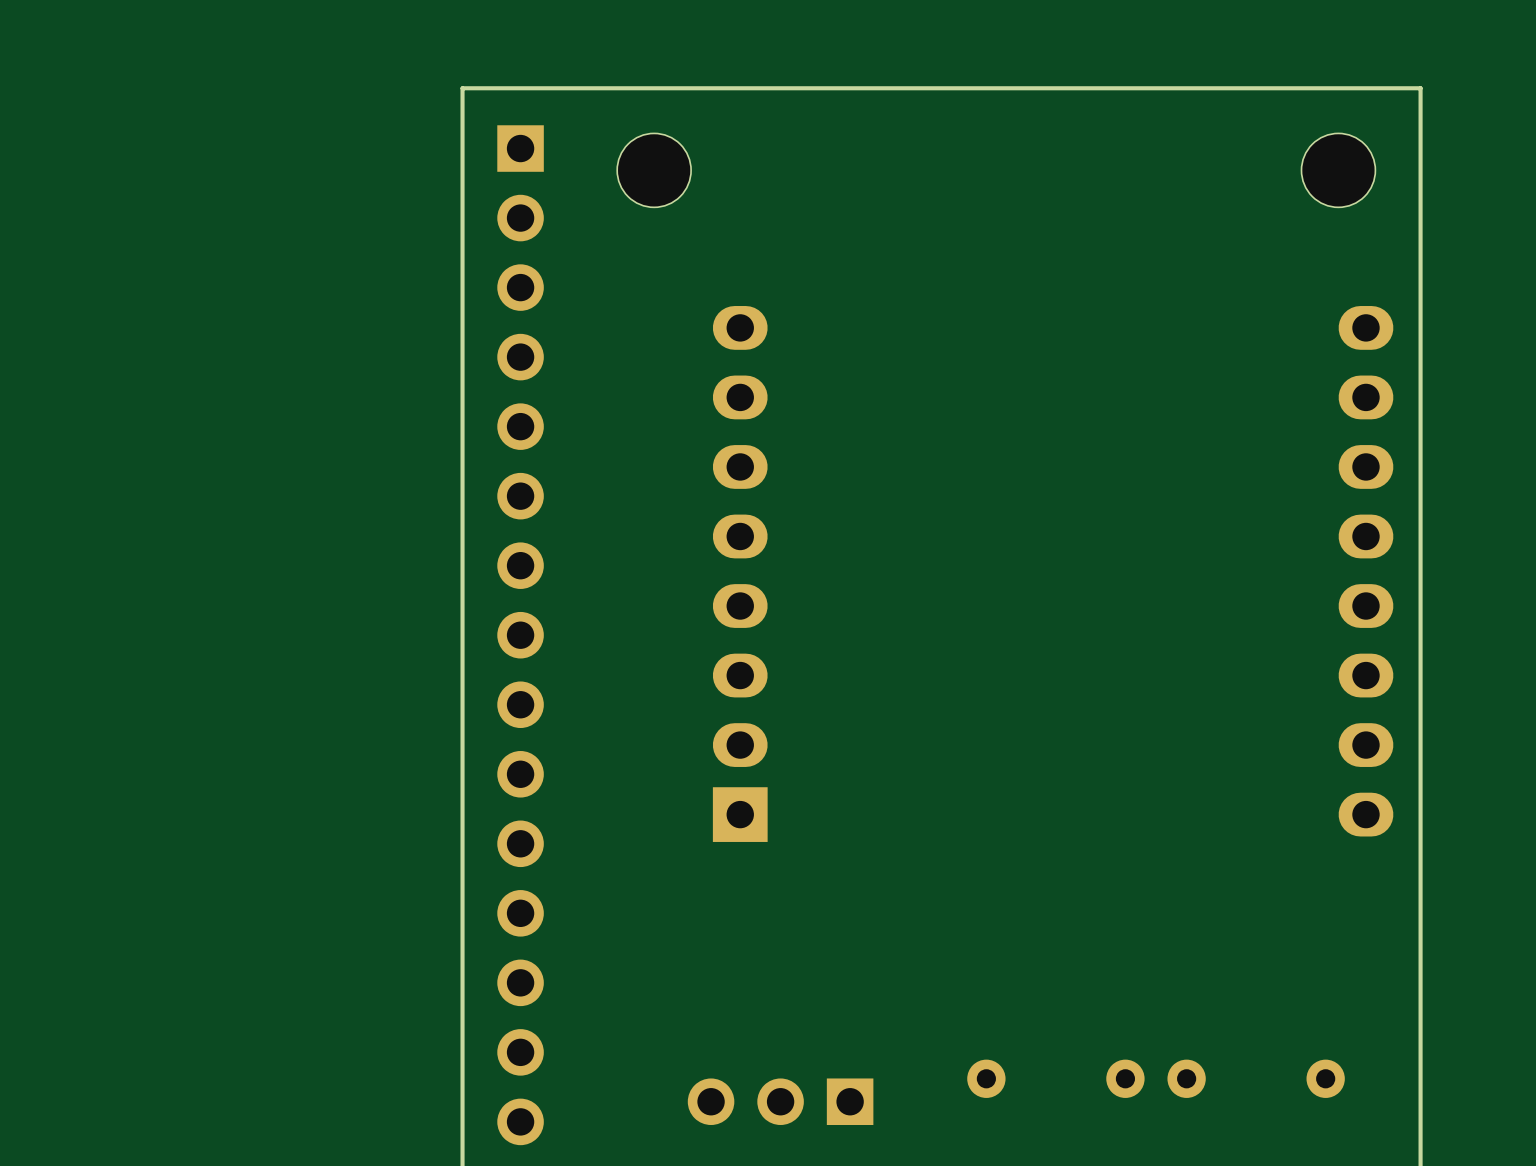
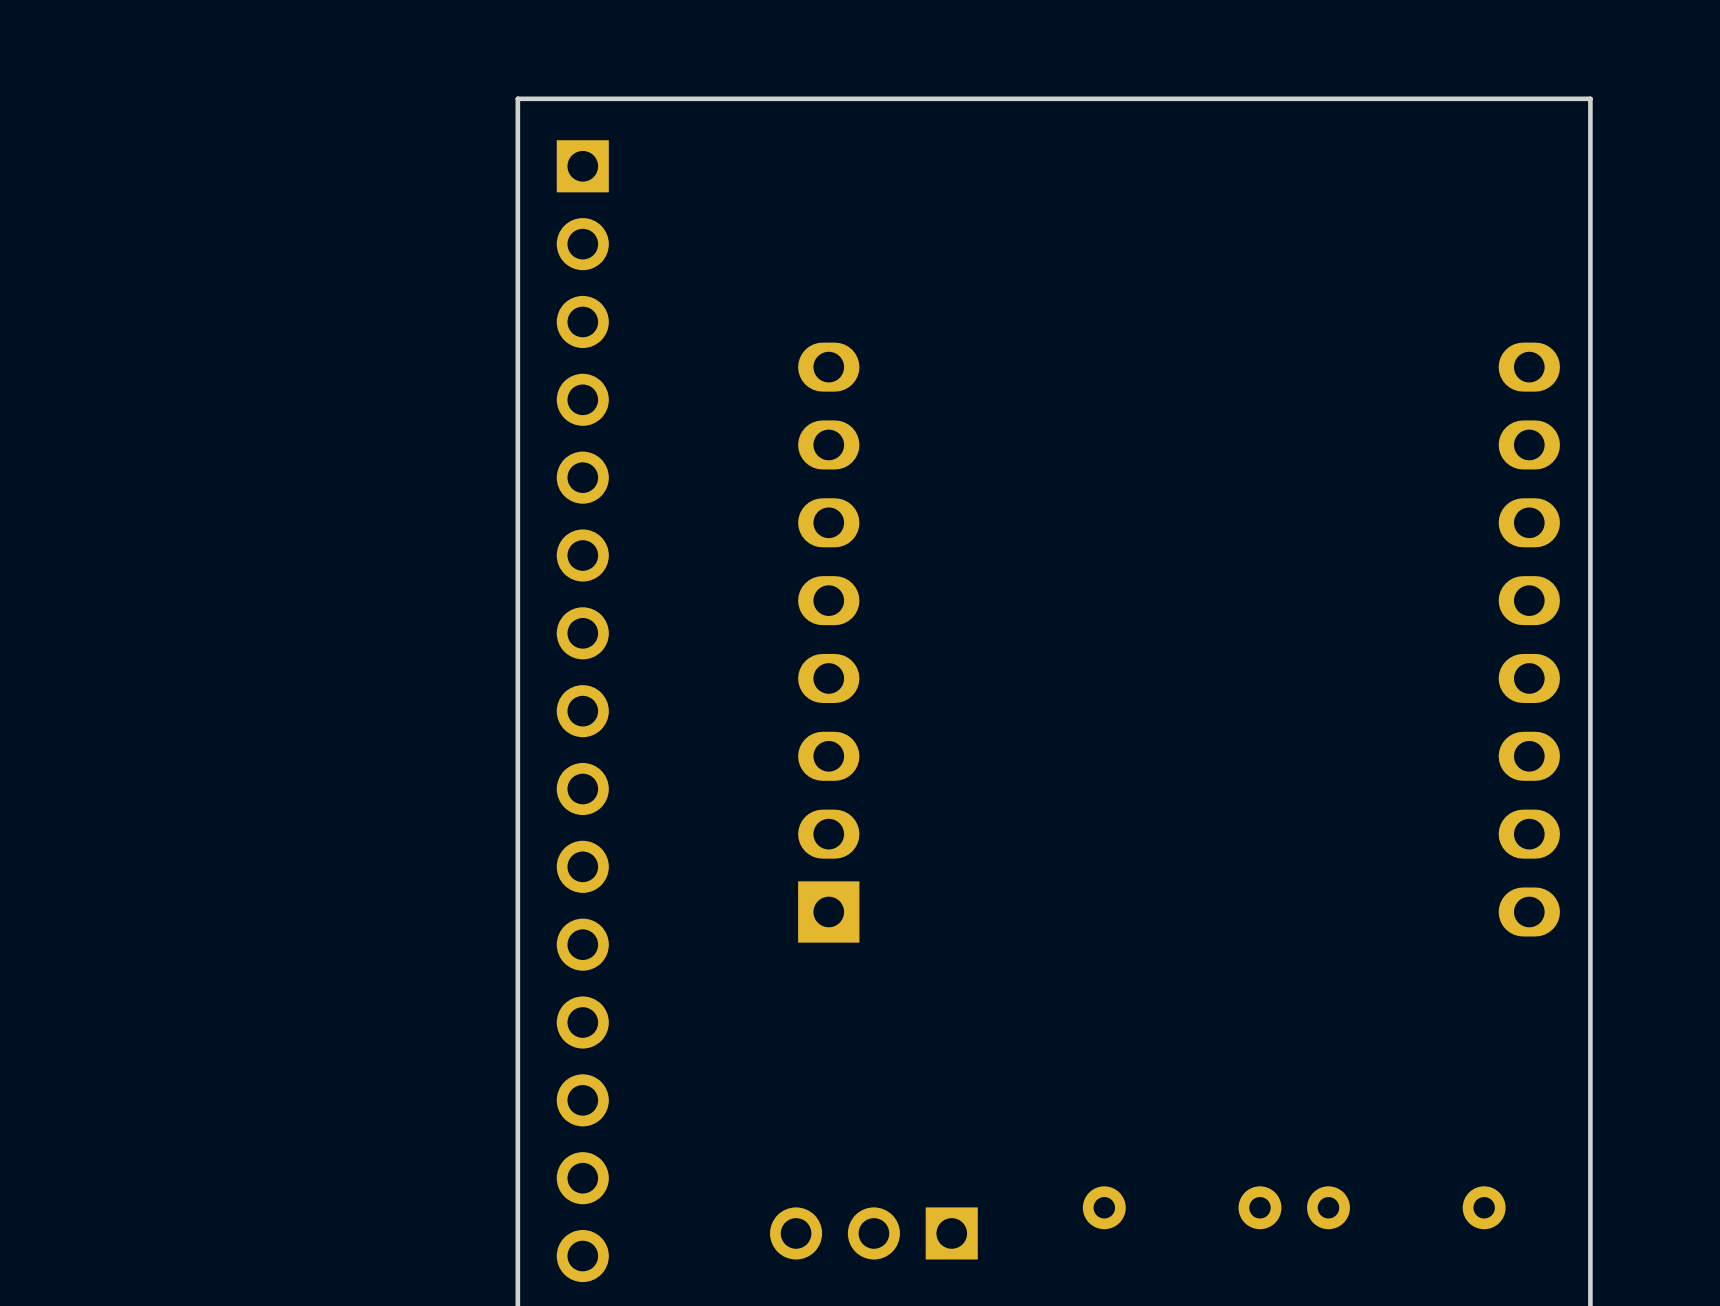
part: (654, 170) -> none
part: (1338, 170) -> none

